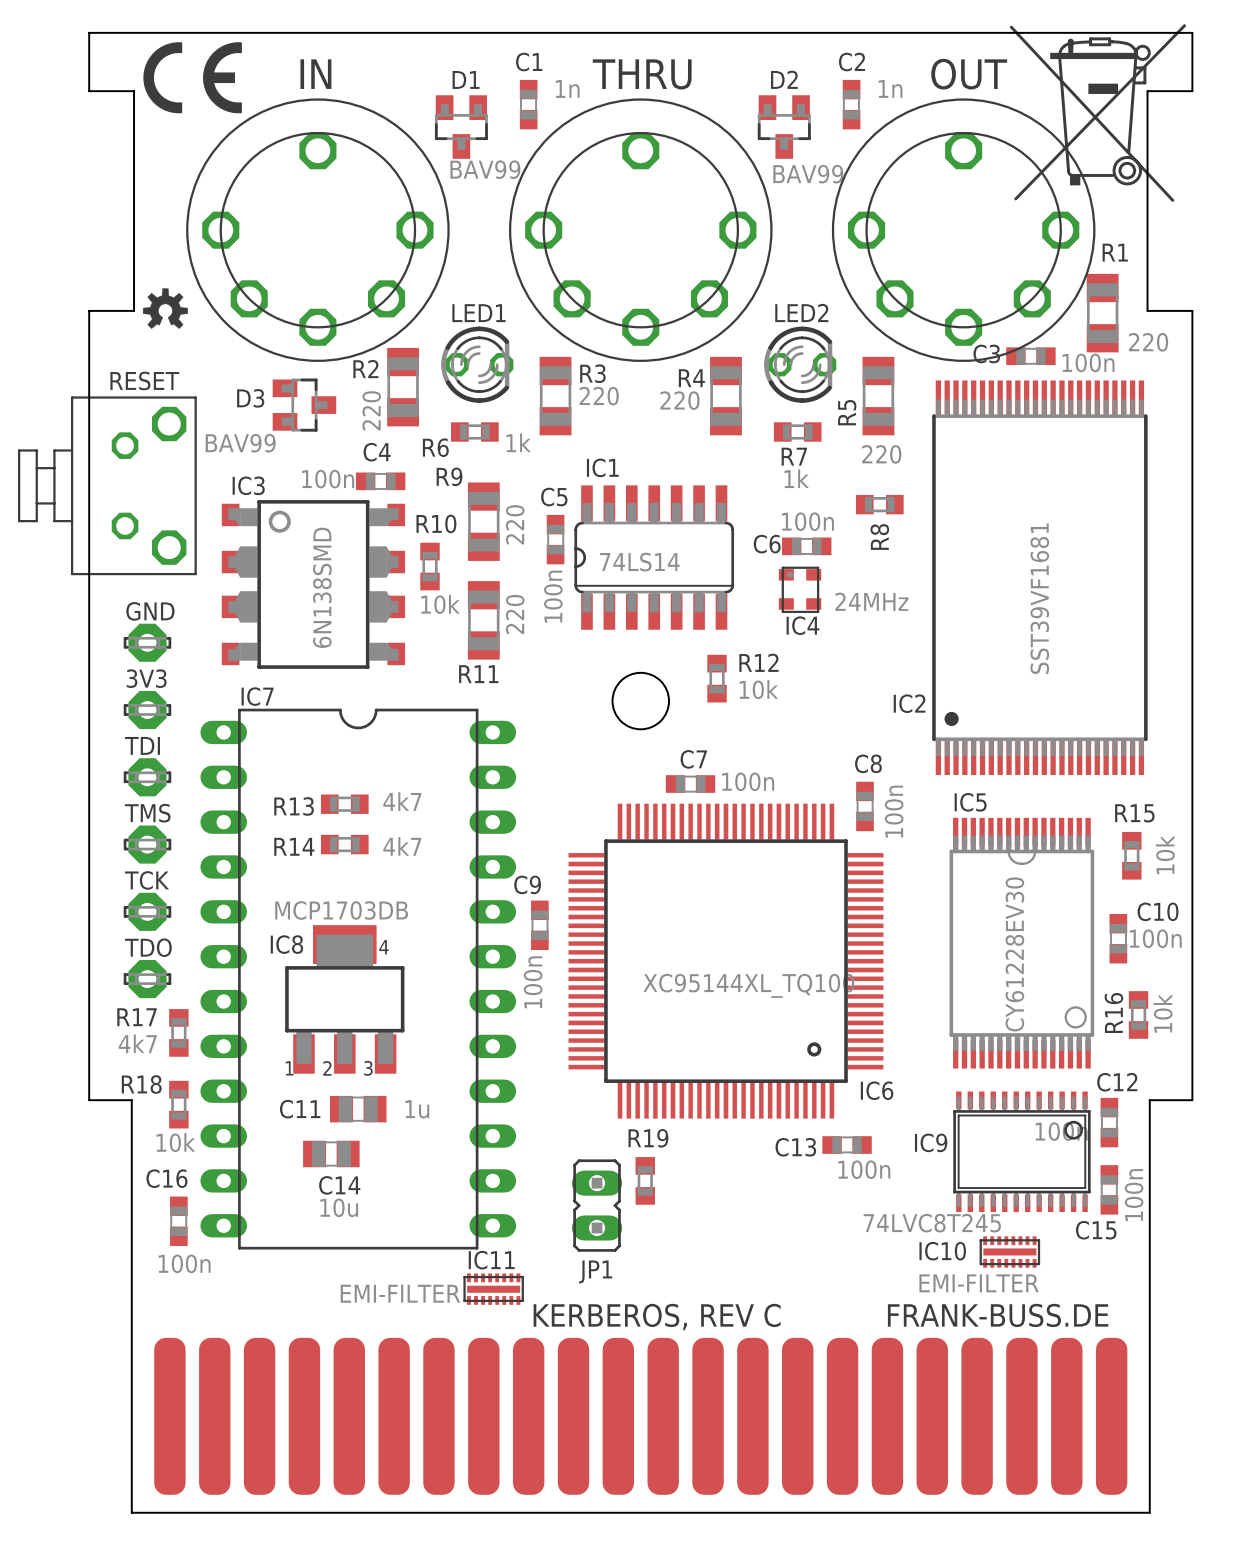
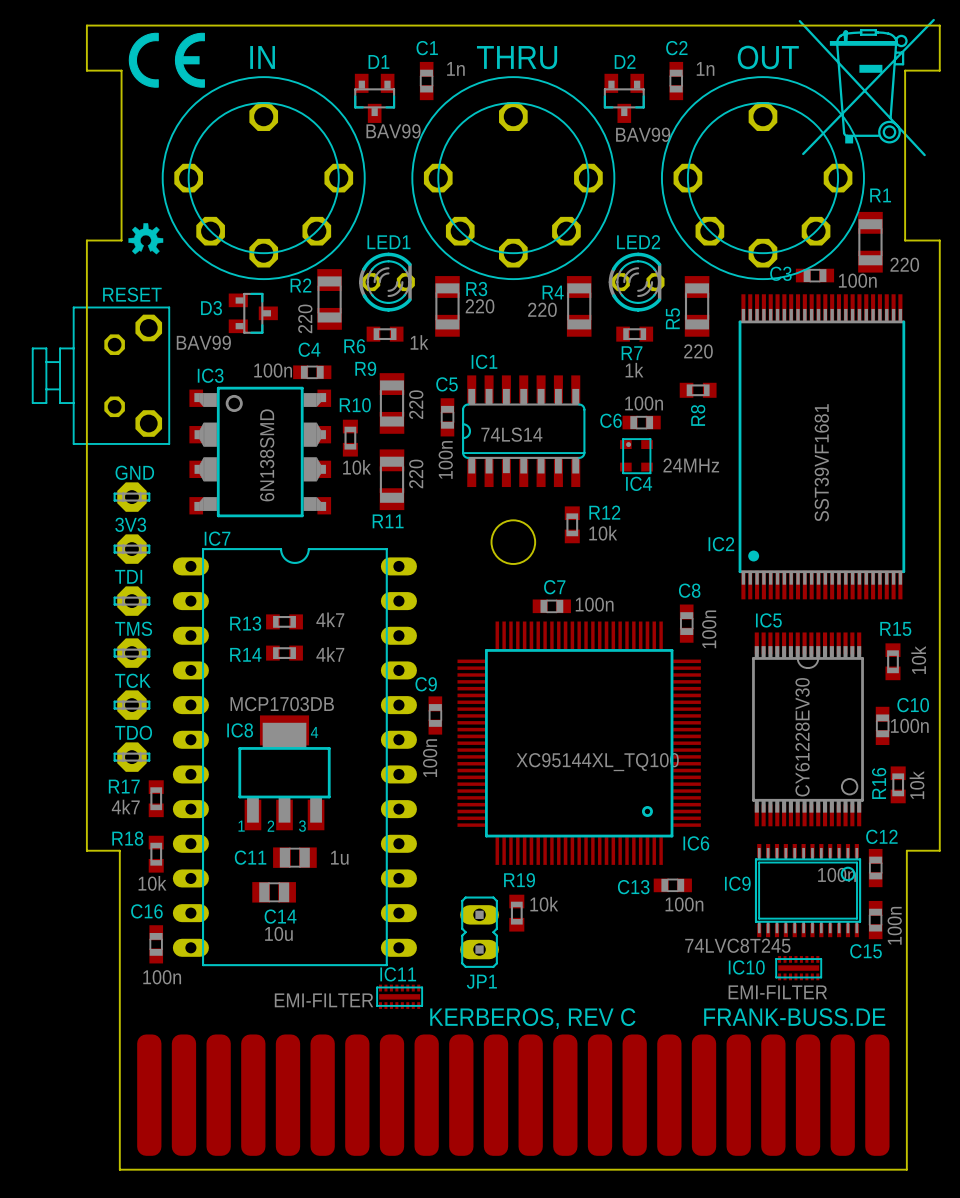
R19 value: none -> 10k (544, 904)

